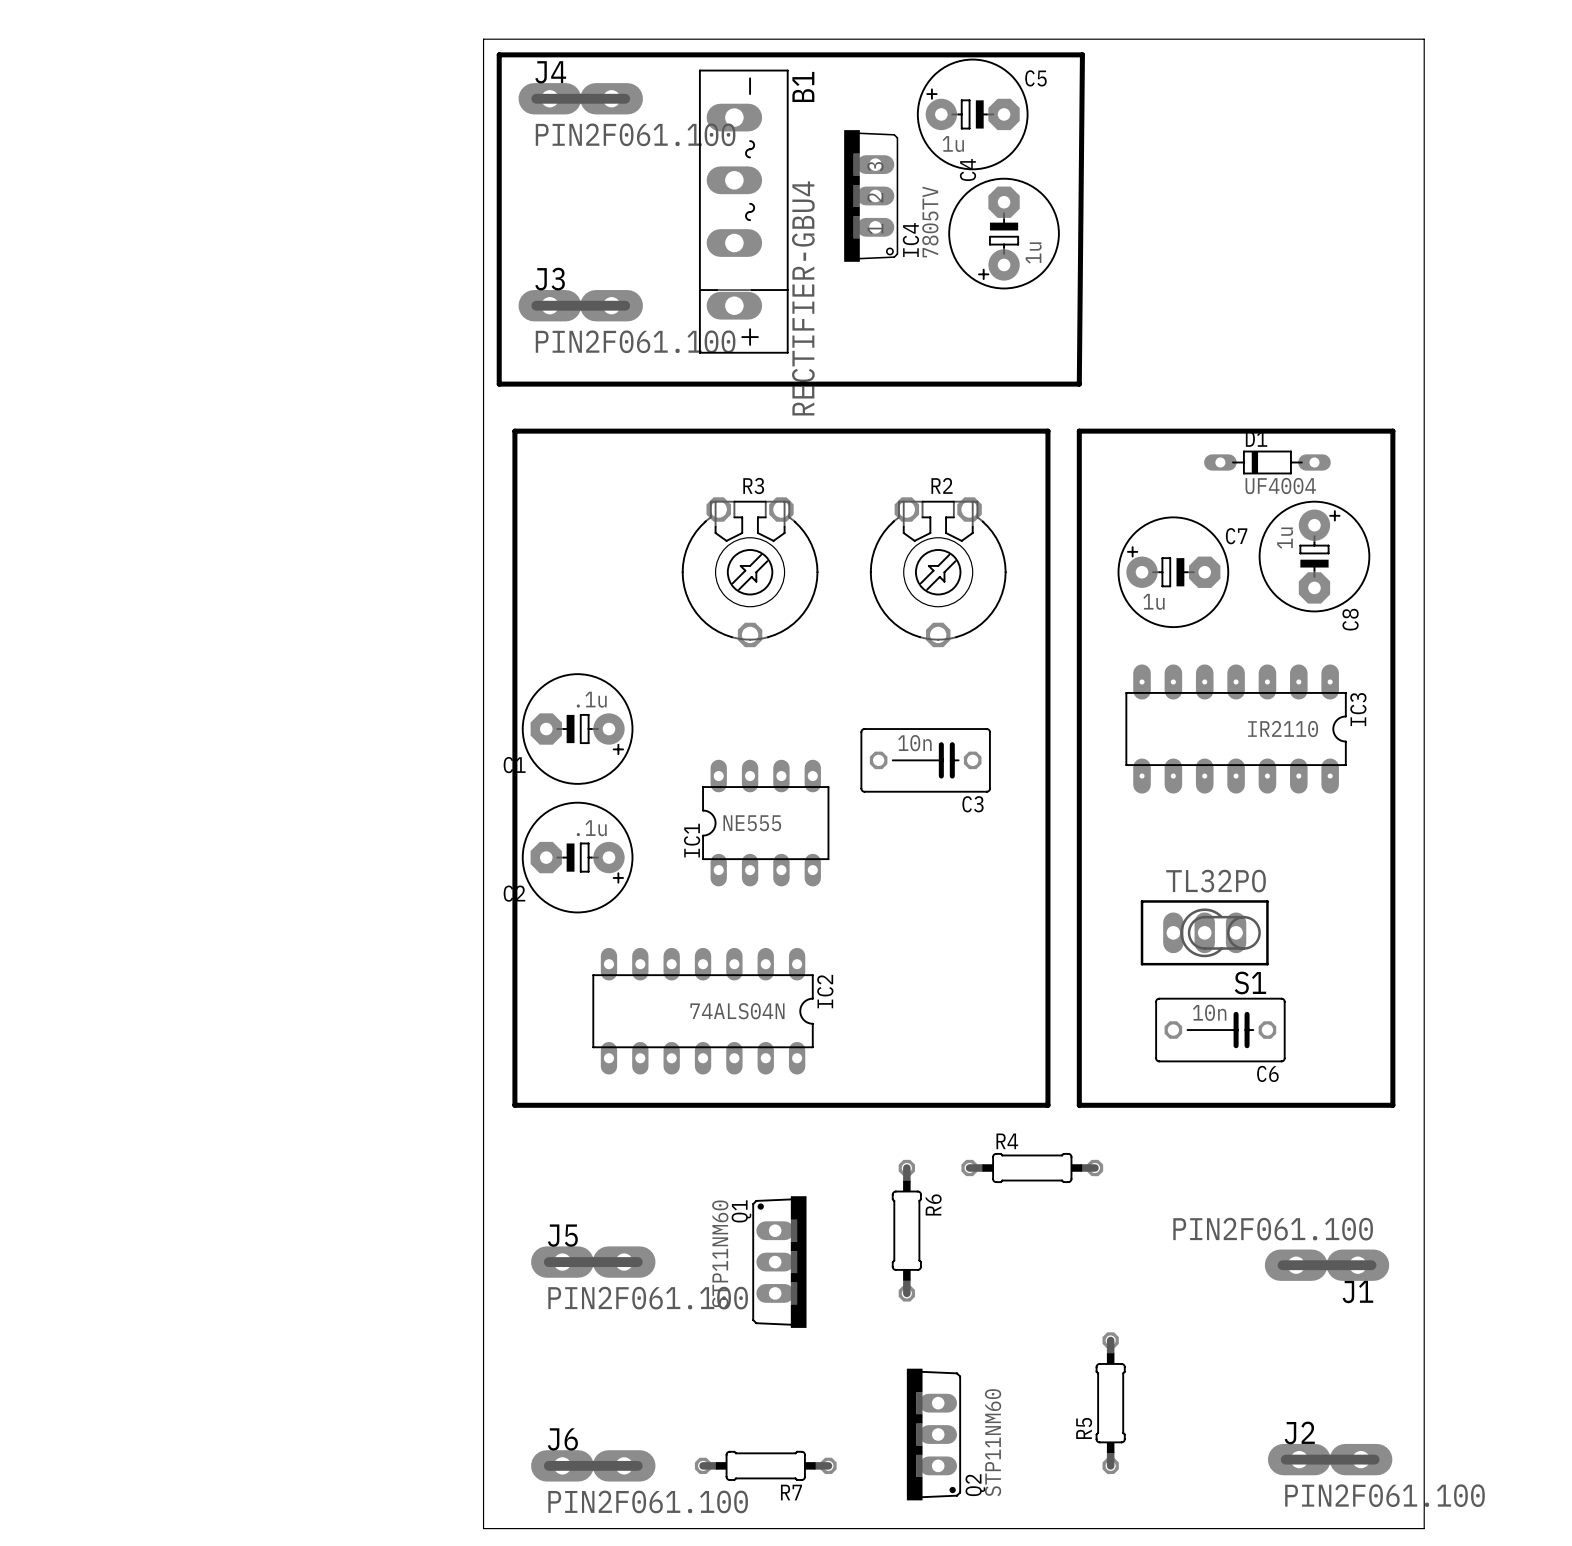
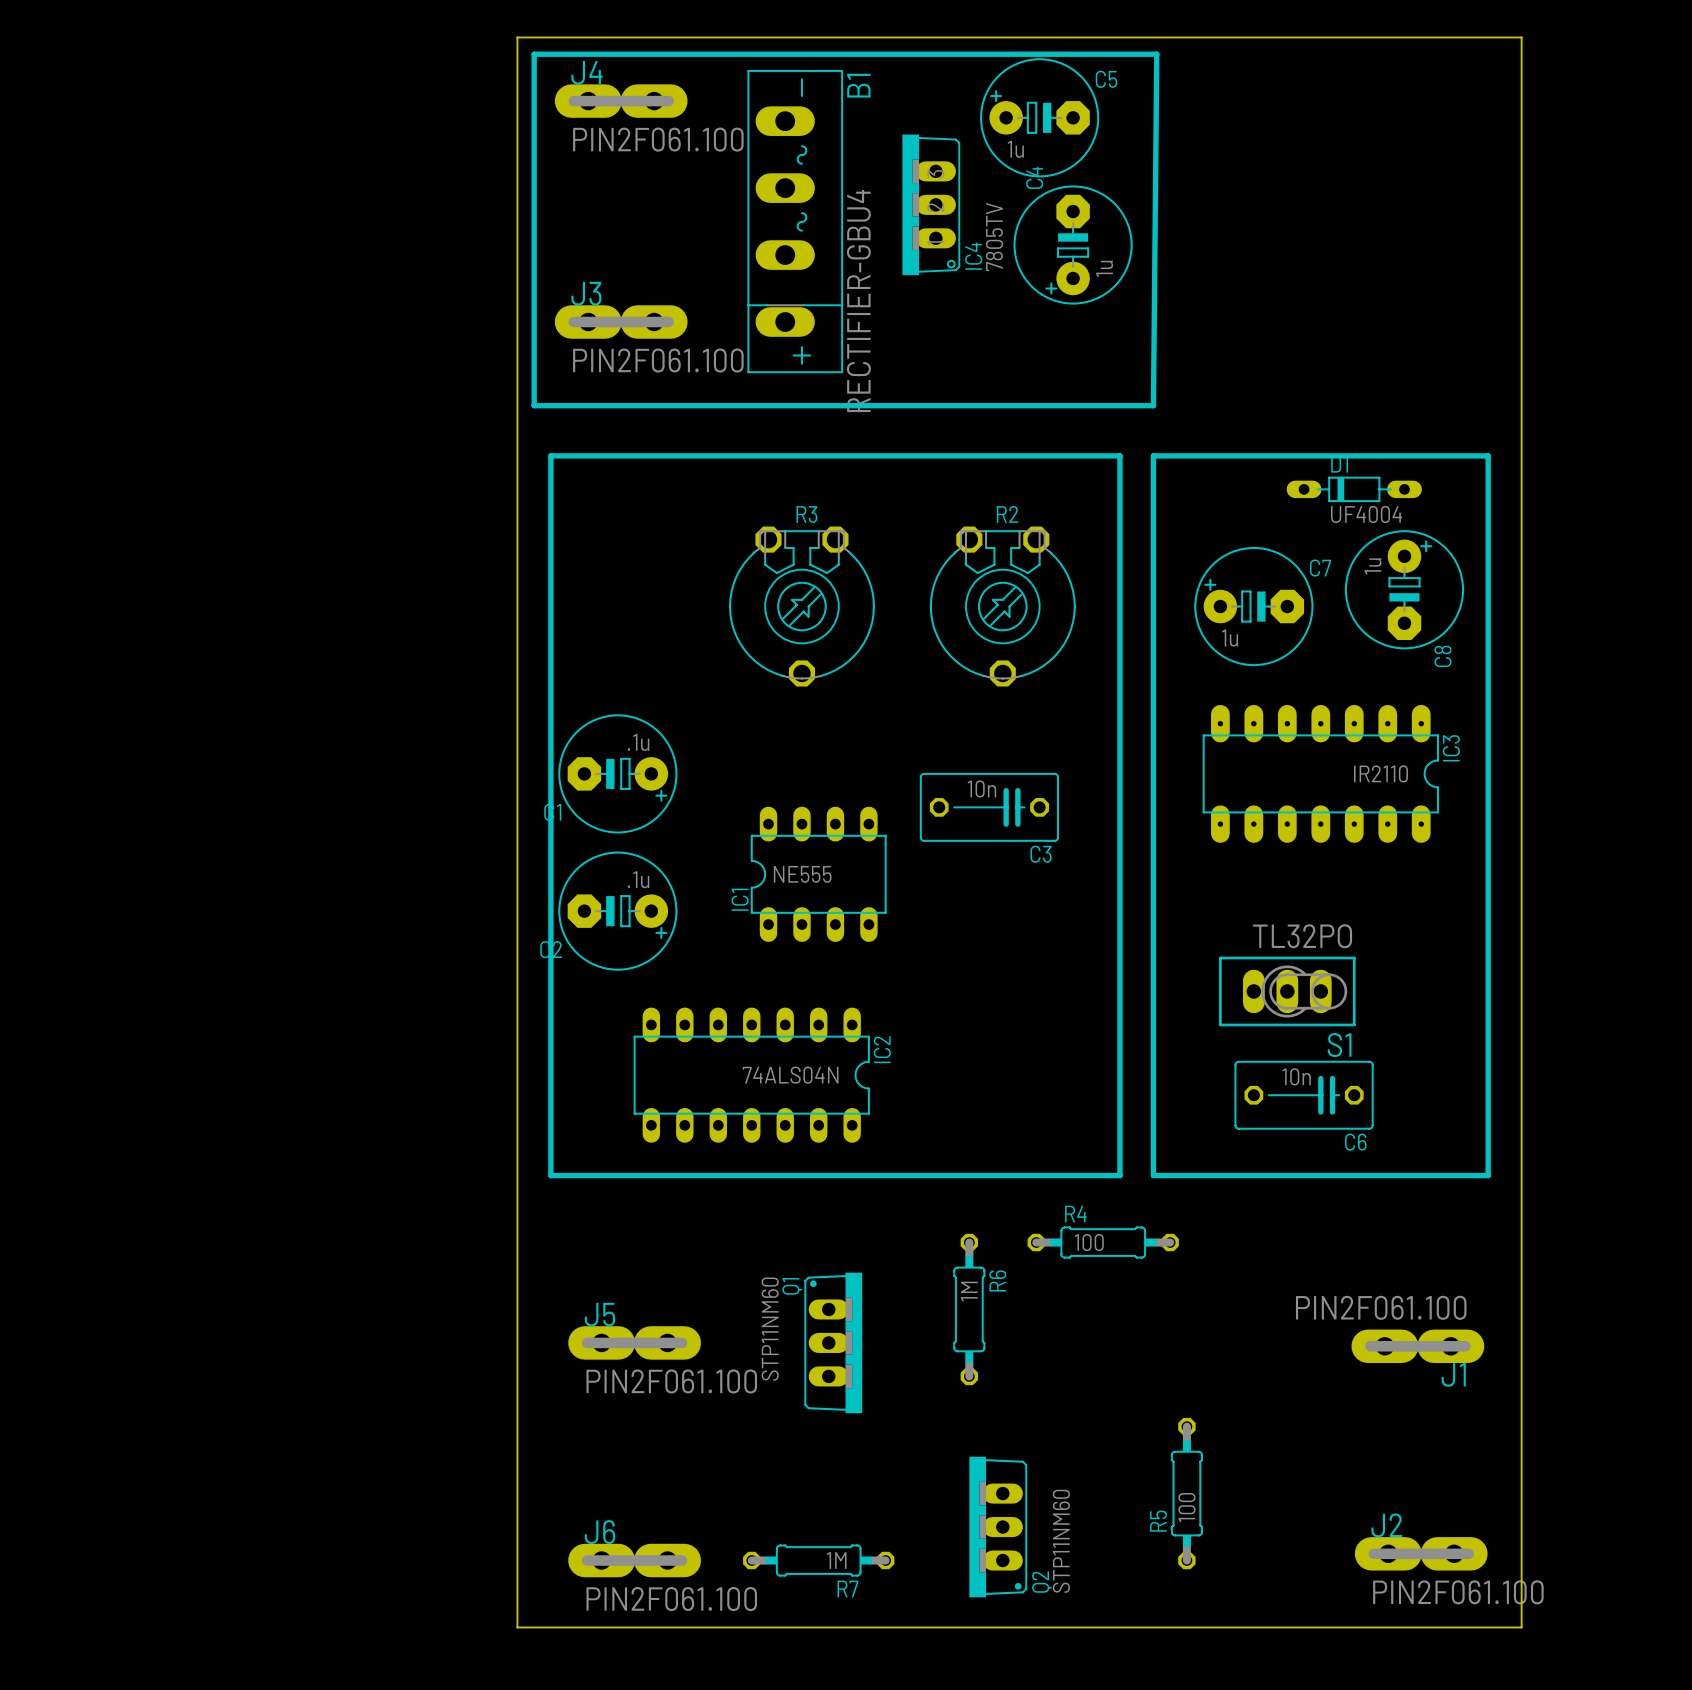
R4 value: none -> 100 (1089, 1242)
R6 value: none -> 1M (969, 1291)
R5 value: none -> 100 (1186, 1507)
R7 value: none -> 1M (836, 1560)

